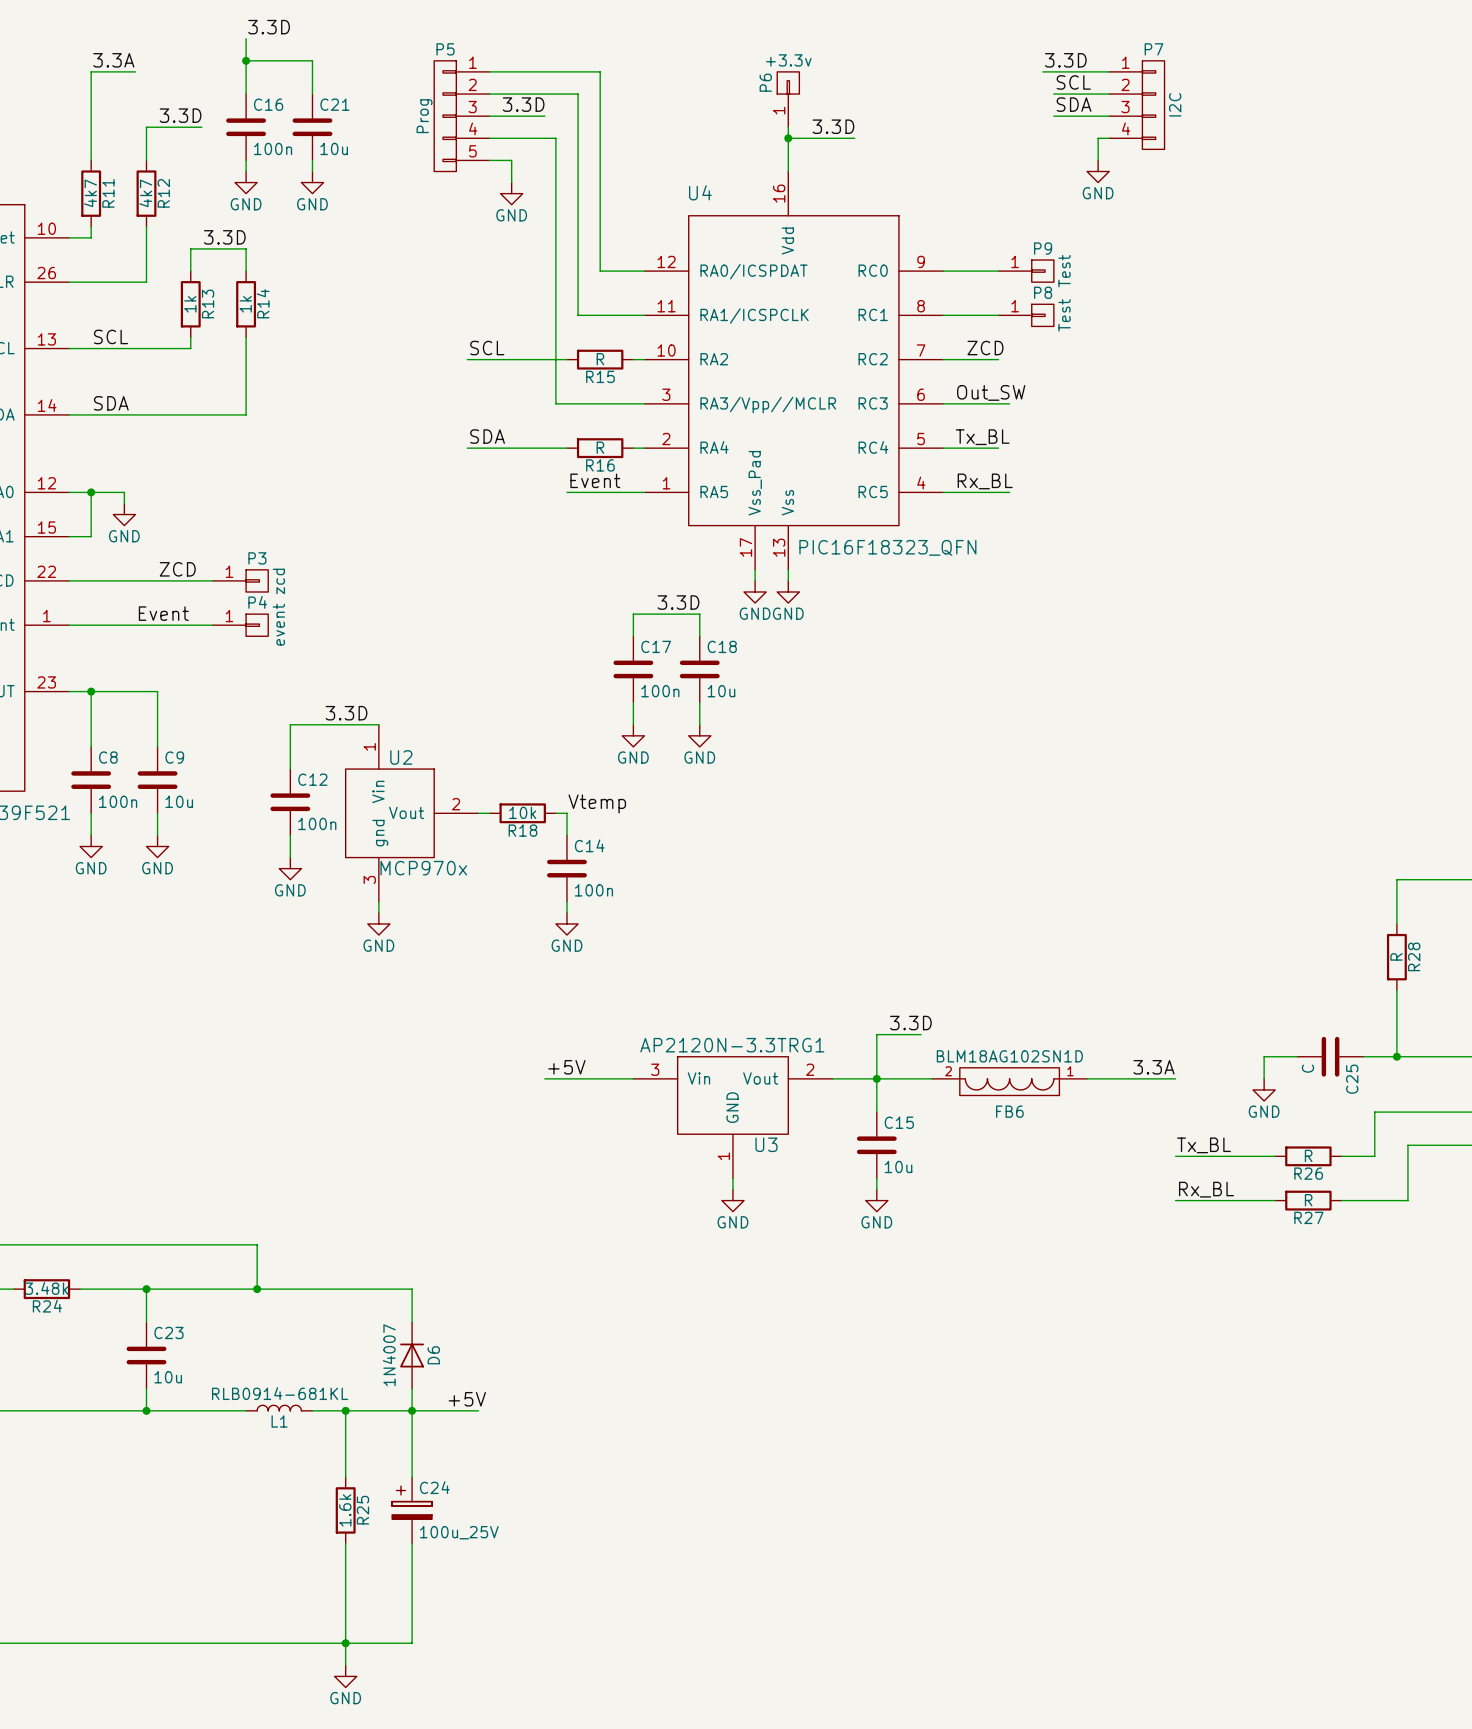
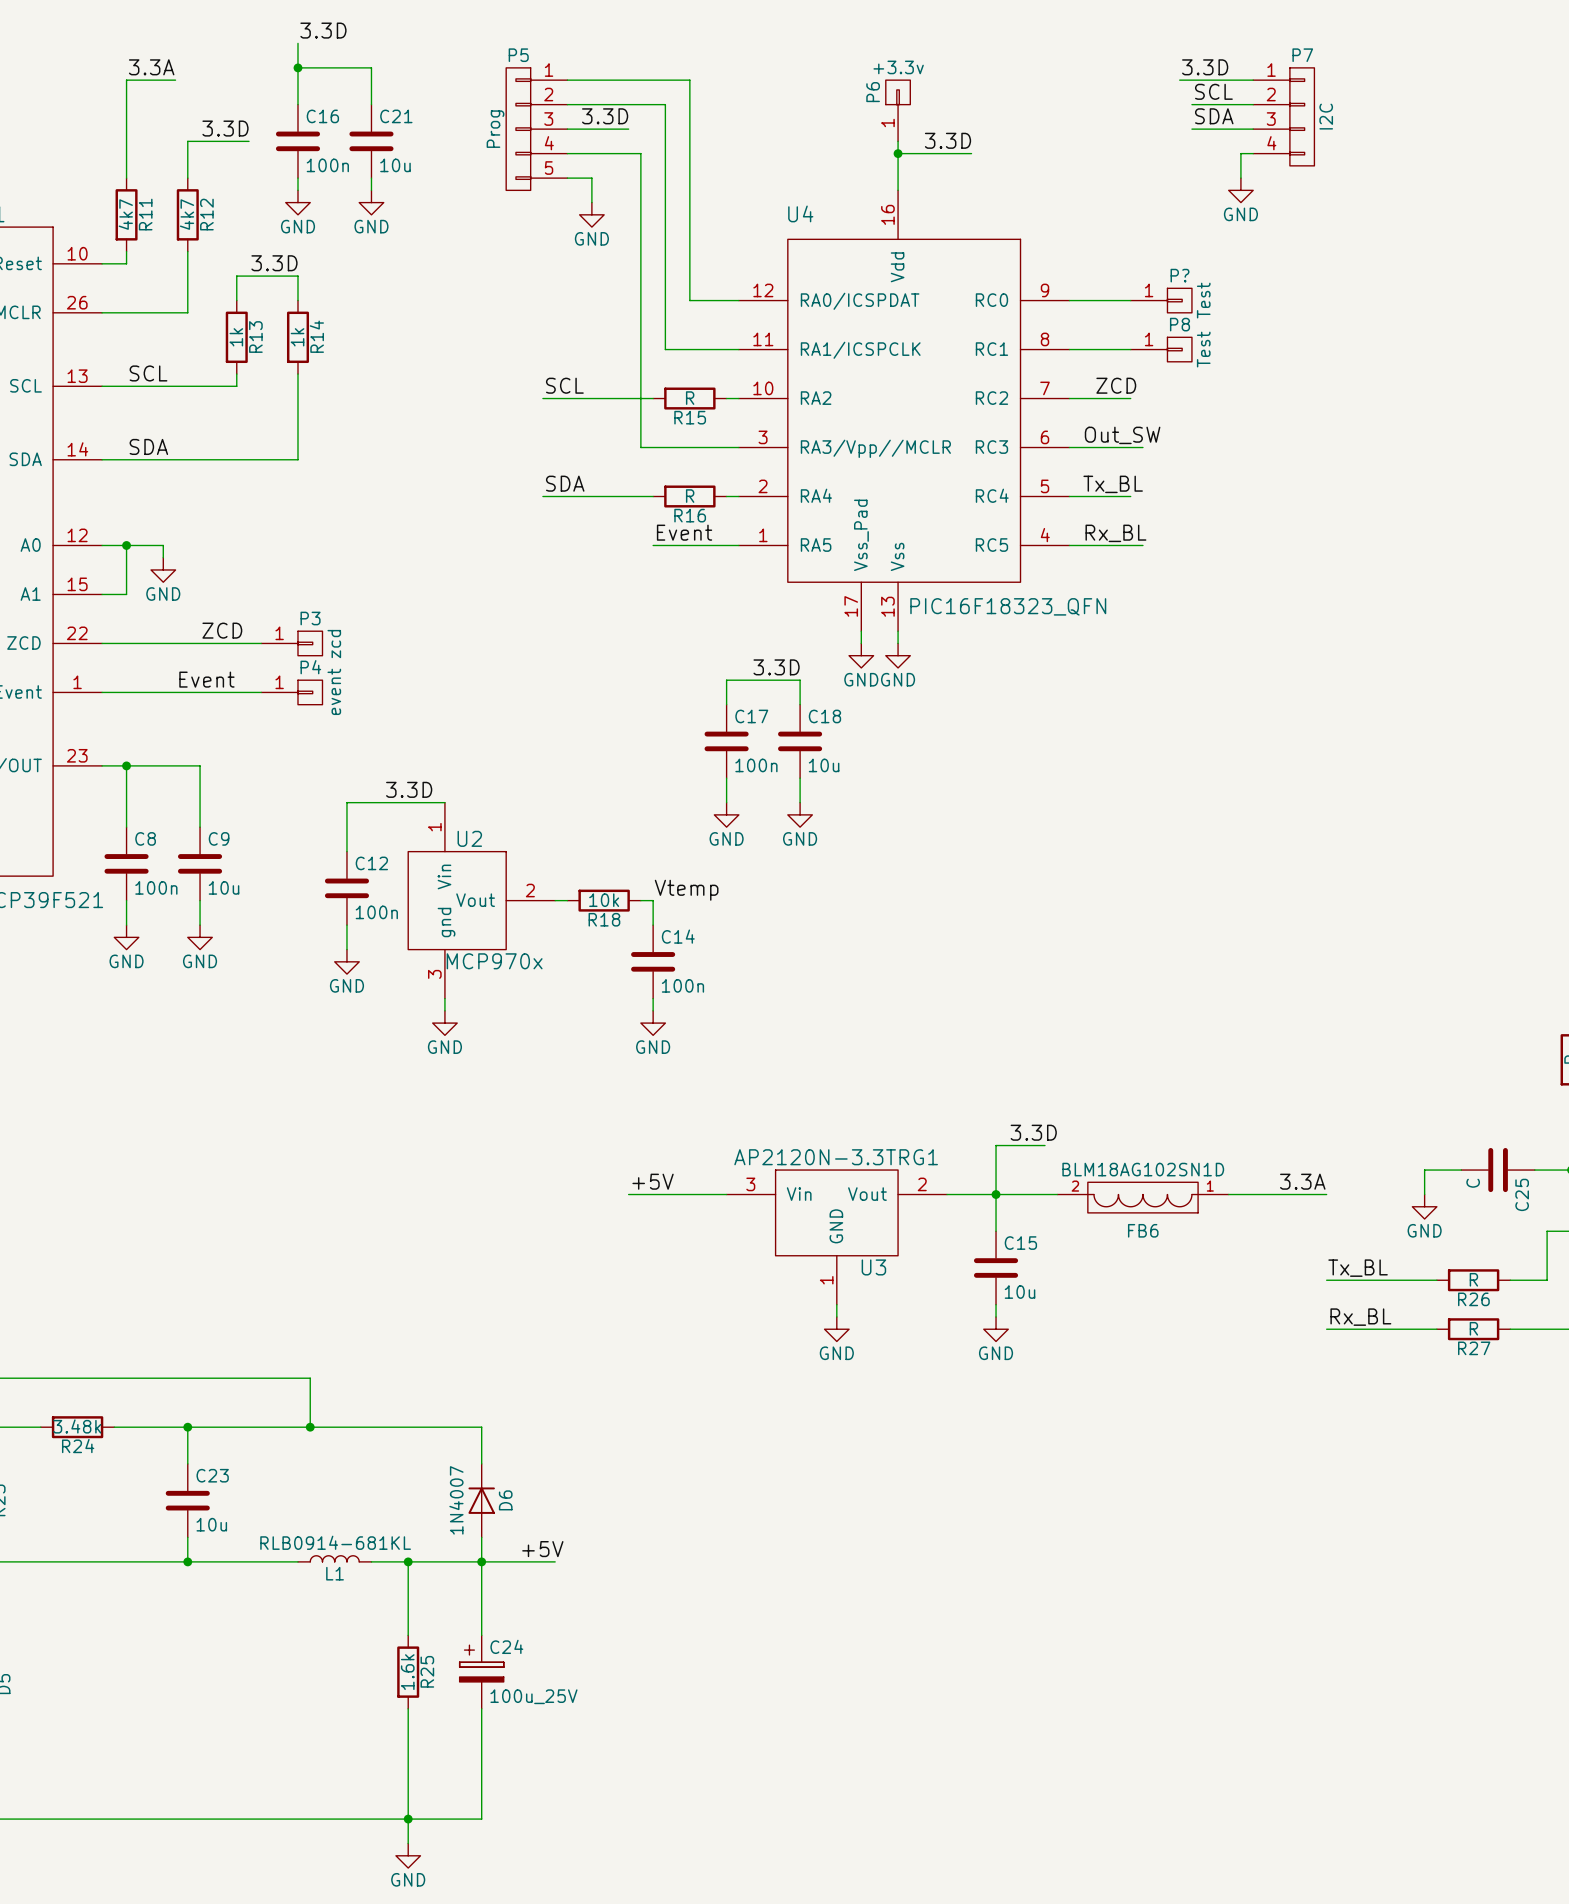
P9 name: P9 (1043, 248) -> P? (1180, 275)

